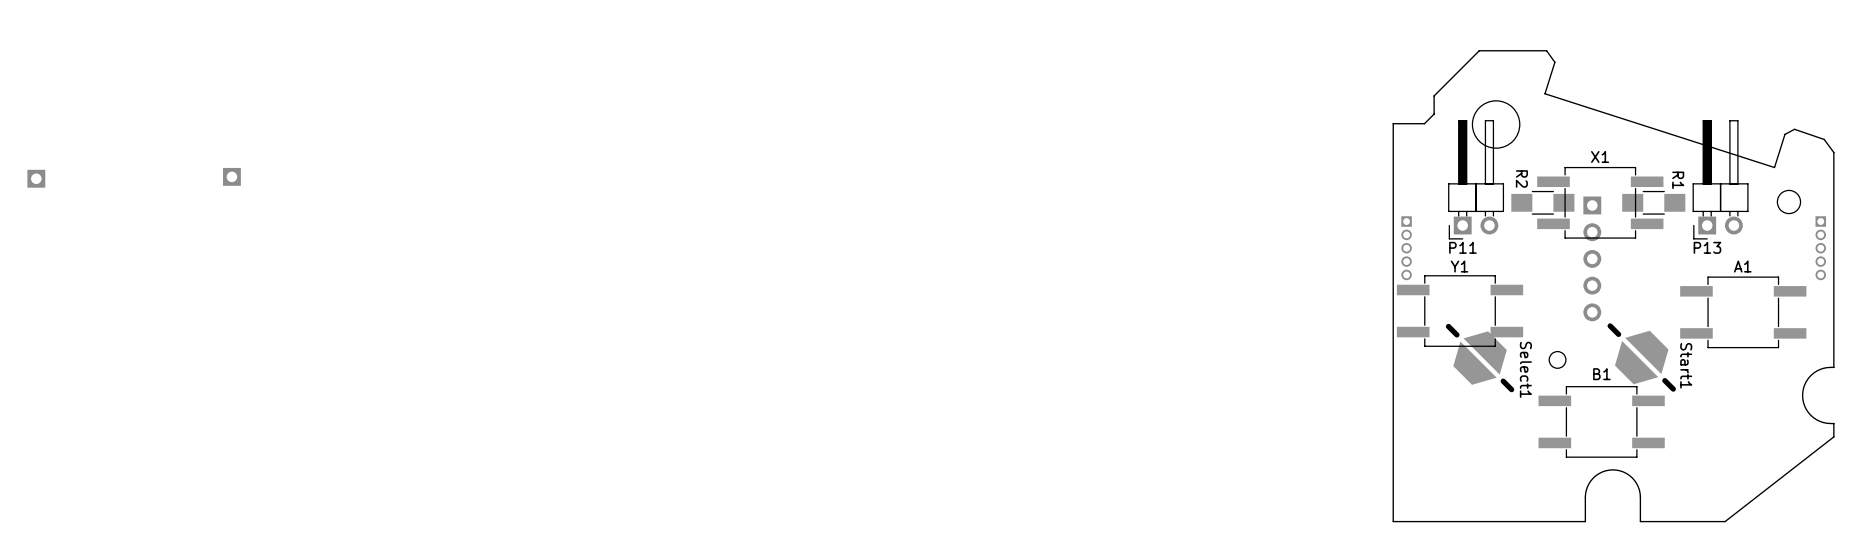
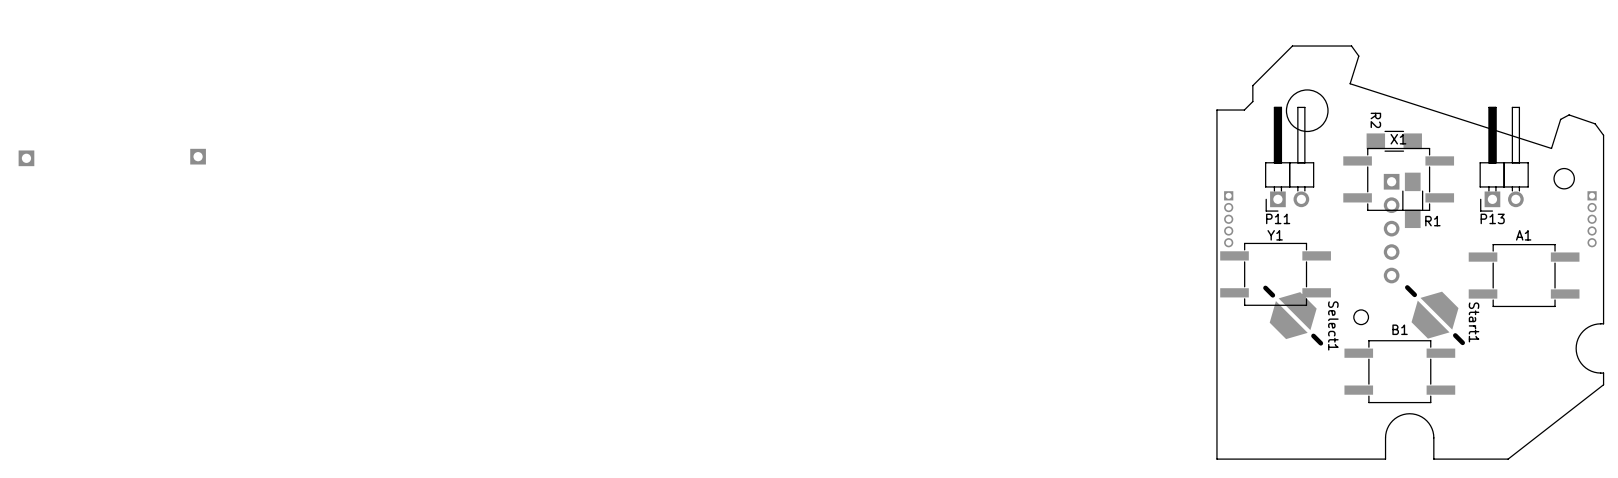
R2 position: (1542, 202) -> (1394, 141)
R1 rotation: 0° (1653, 202) -> 90° clockwise (1412, 200)
R1 position: (1653, 202) -> (1412, 200)

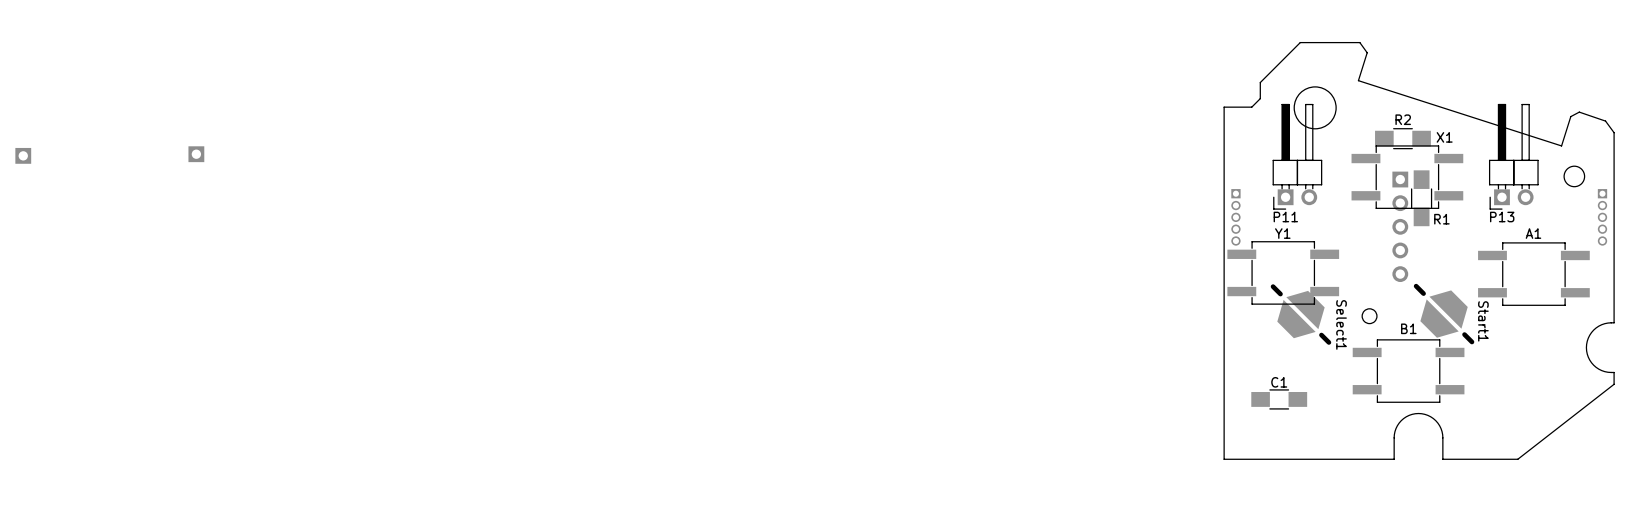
R2 name rotation: 0° (1375, 120) -> 90° counterclockwise (1403, 119)
X1 name position: X1 (1398, 139) -> X1 (1444, 137)
C1: none -> (1279, 399)

